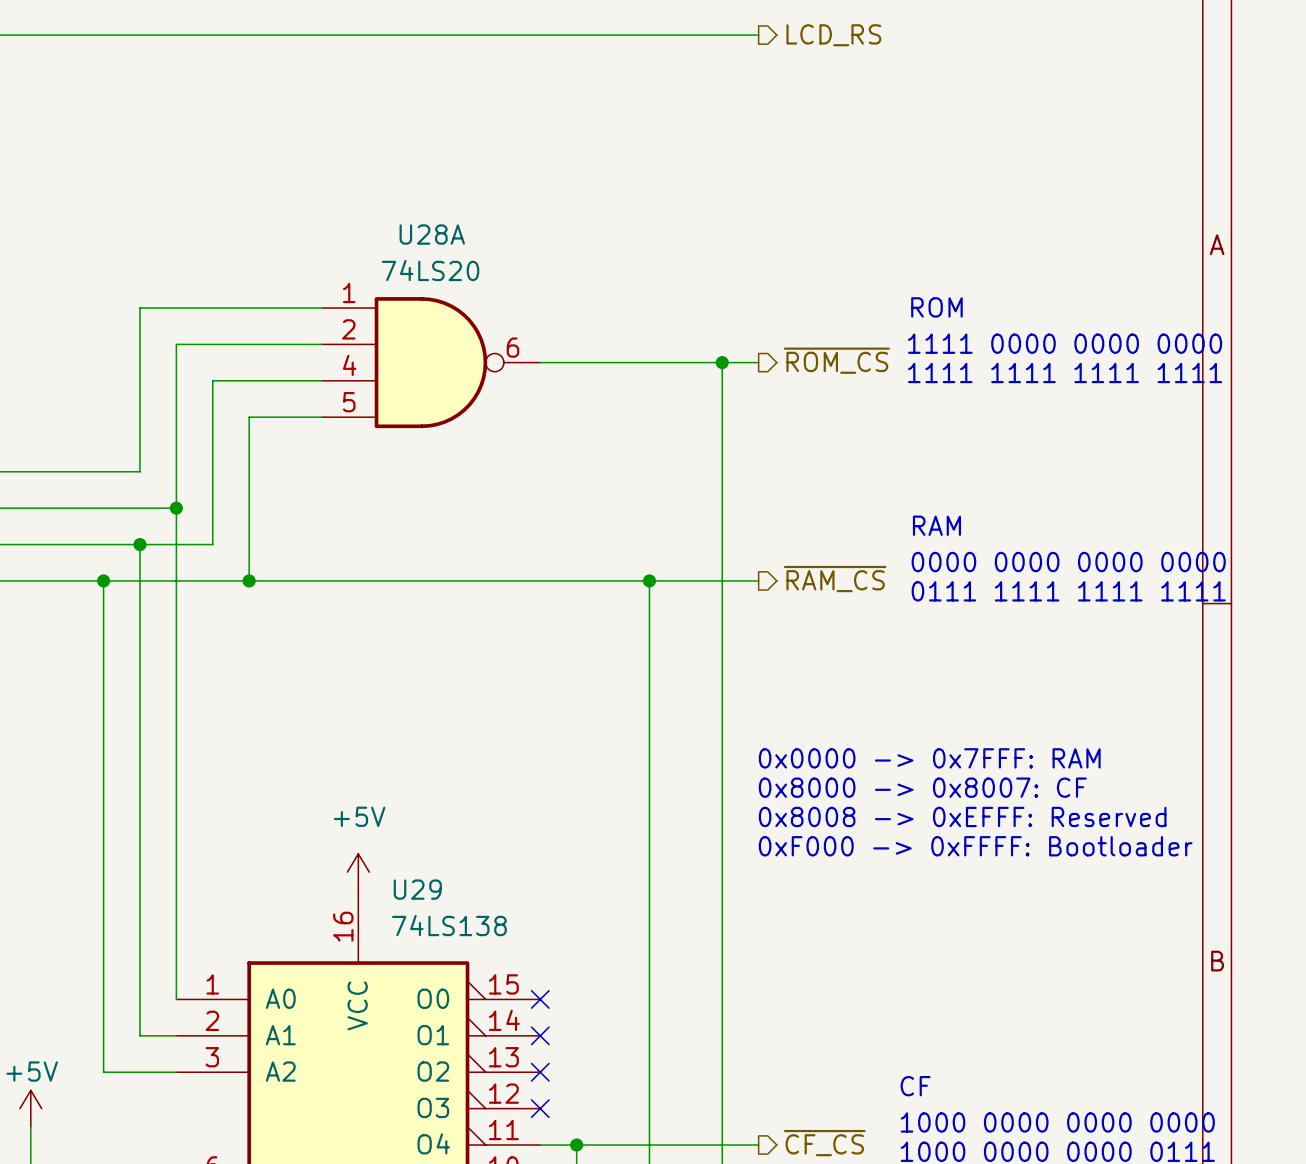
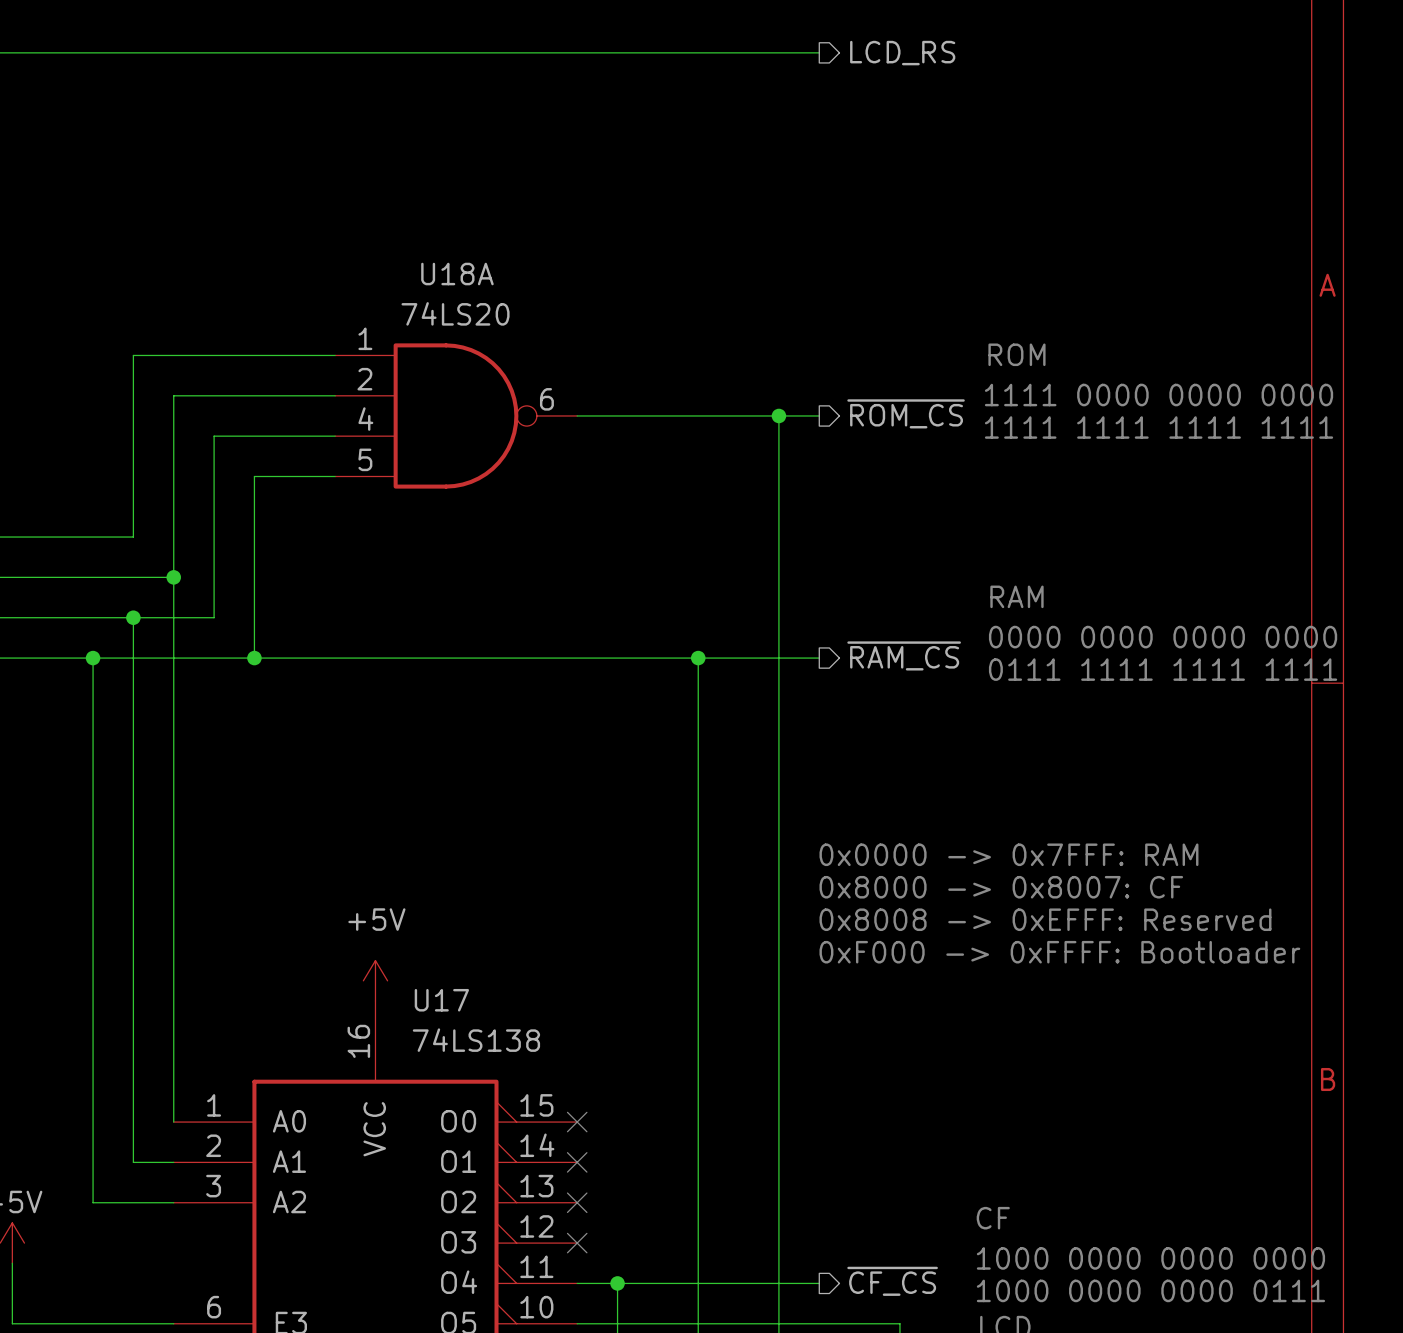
U28A name: U28A (432, 234) -> U18A (457, 274)
U29 name: U29 (417, 889) -> U17 (441, 1000)

